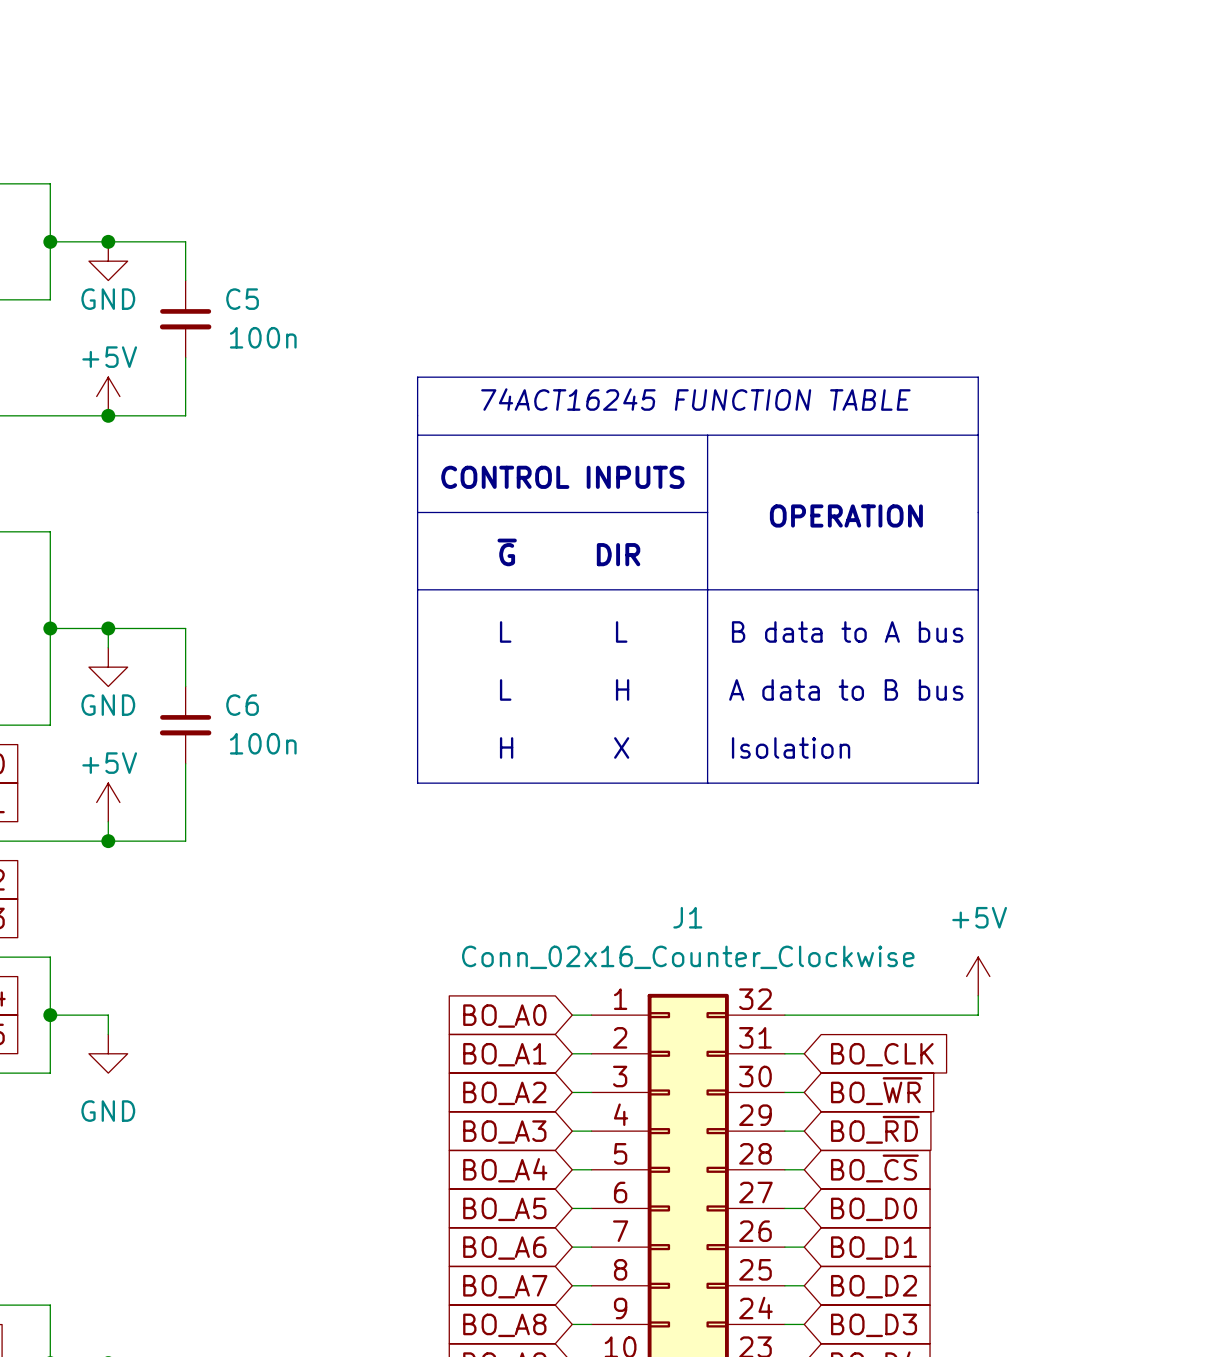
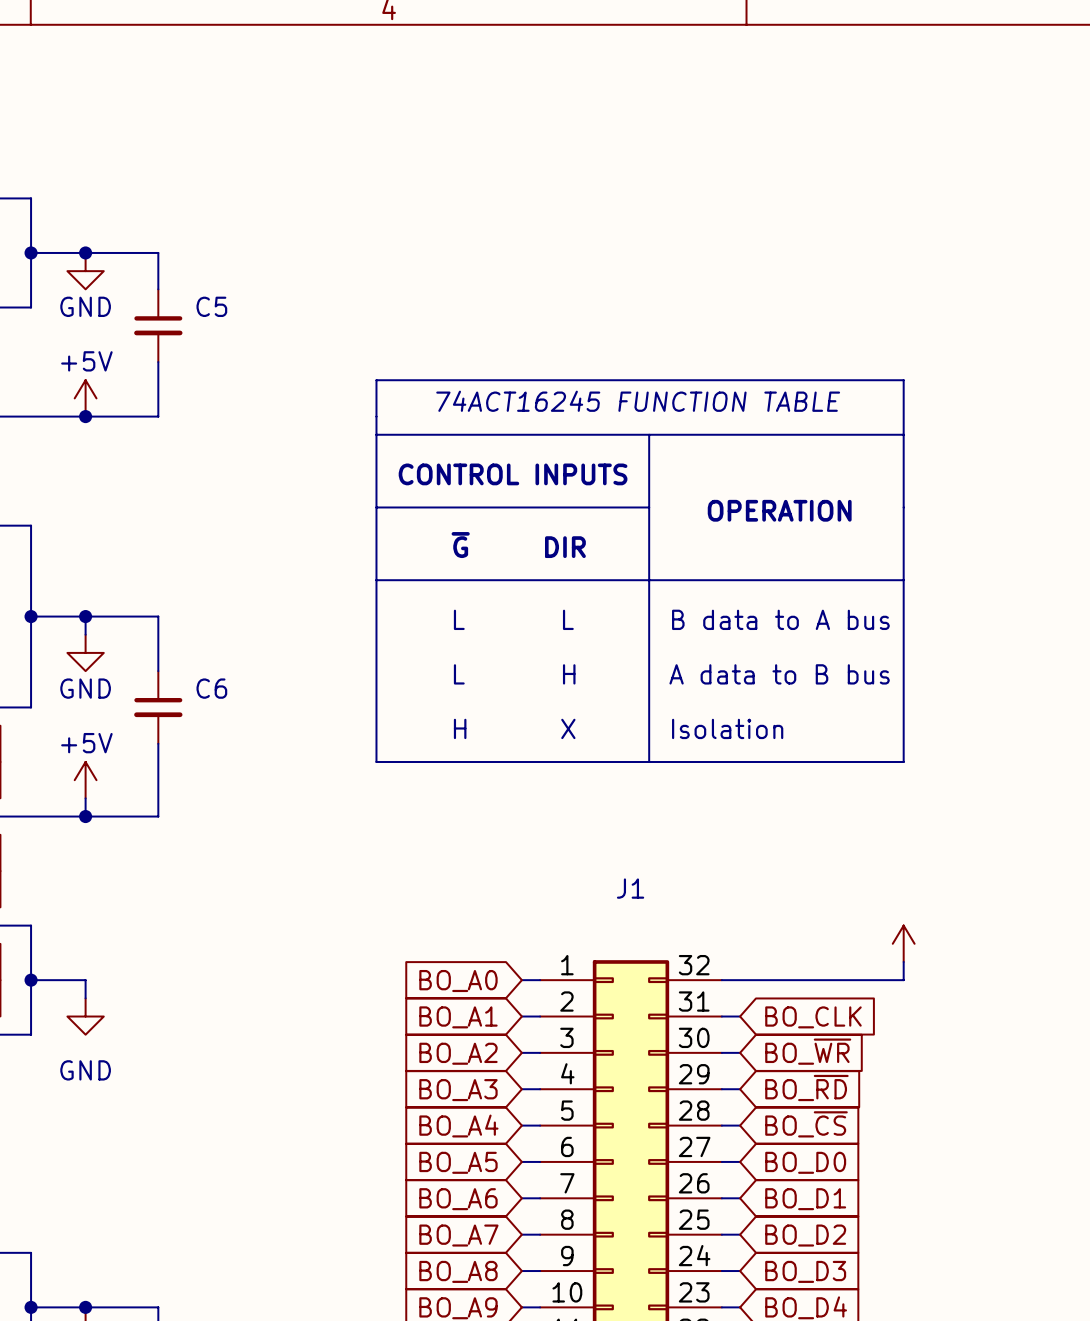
C5 value: 100n (263, 337) -> none
C6 value: 100n (263, 743) -> none
power symbol text: +5V (979, 917) -> none
J1 value: Conn_02x16_Counter_Clockwise (688, 957) -> none

